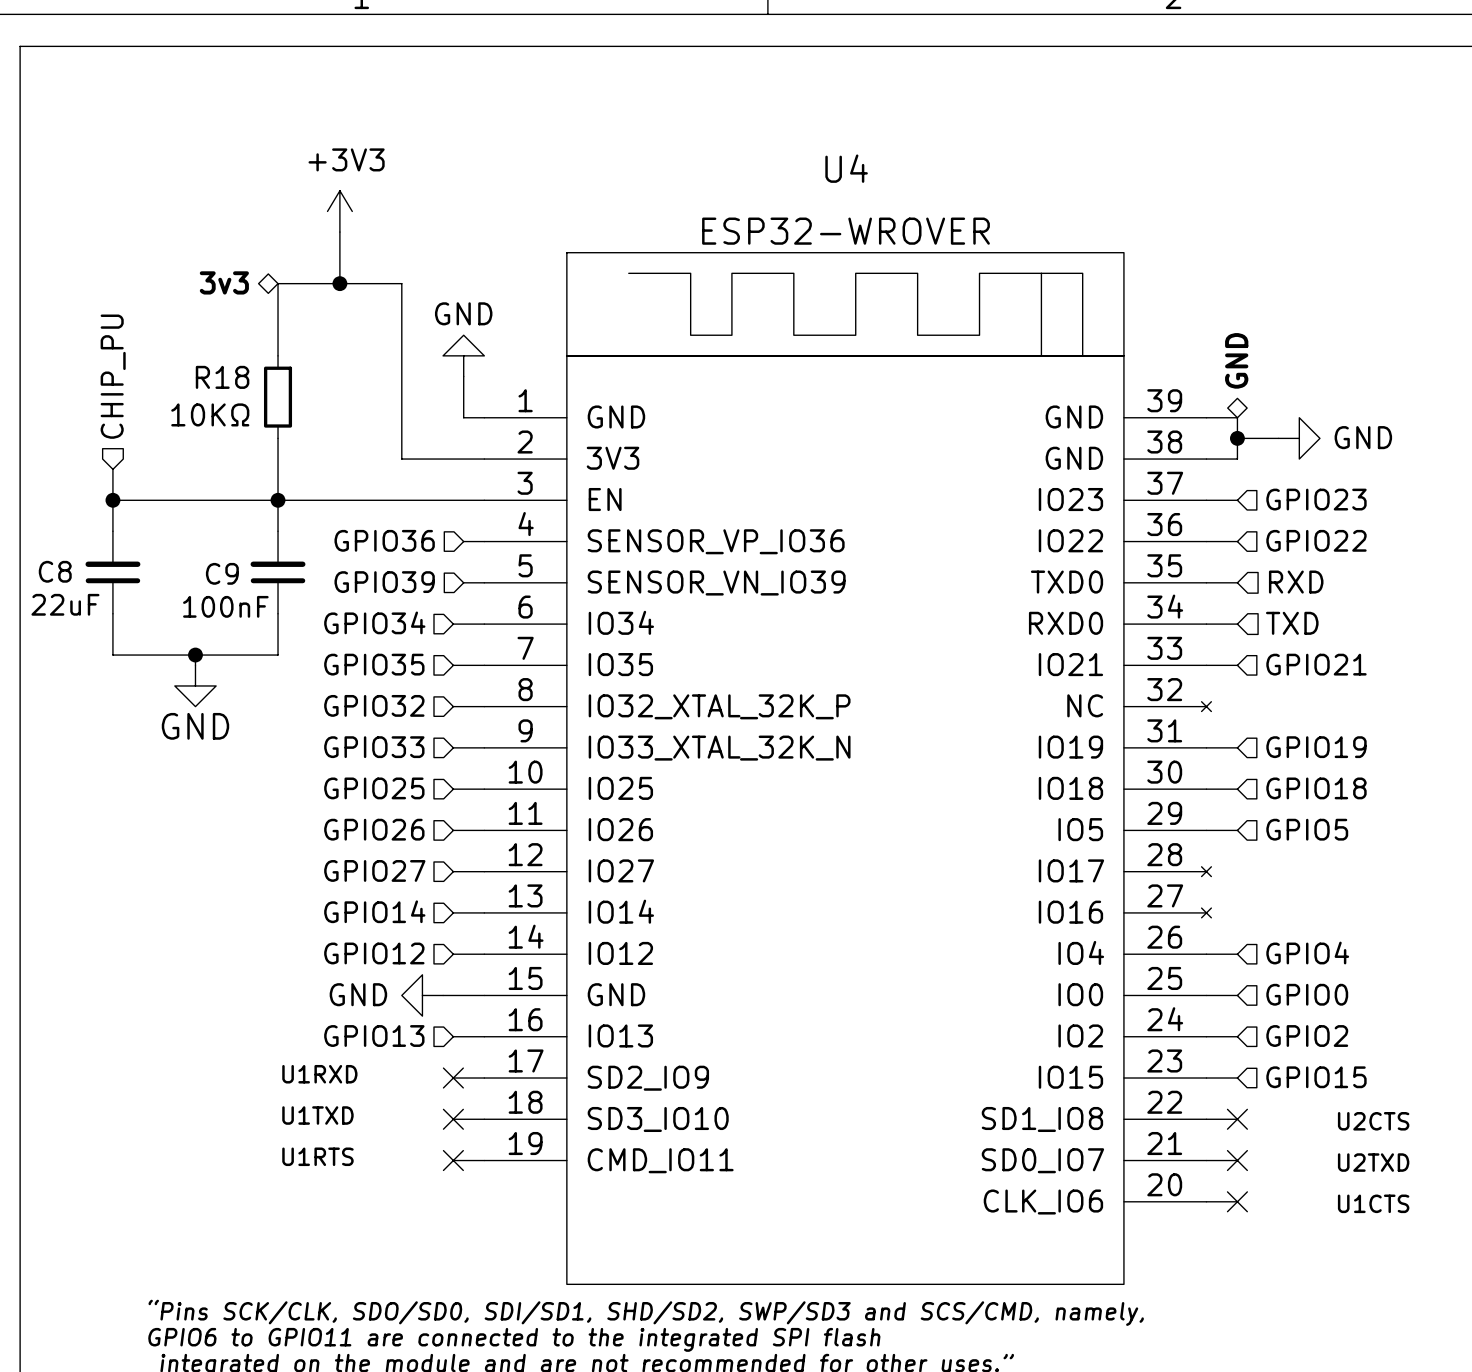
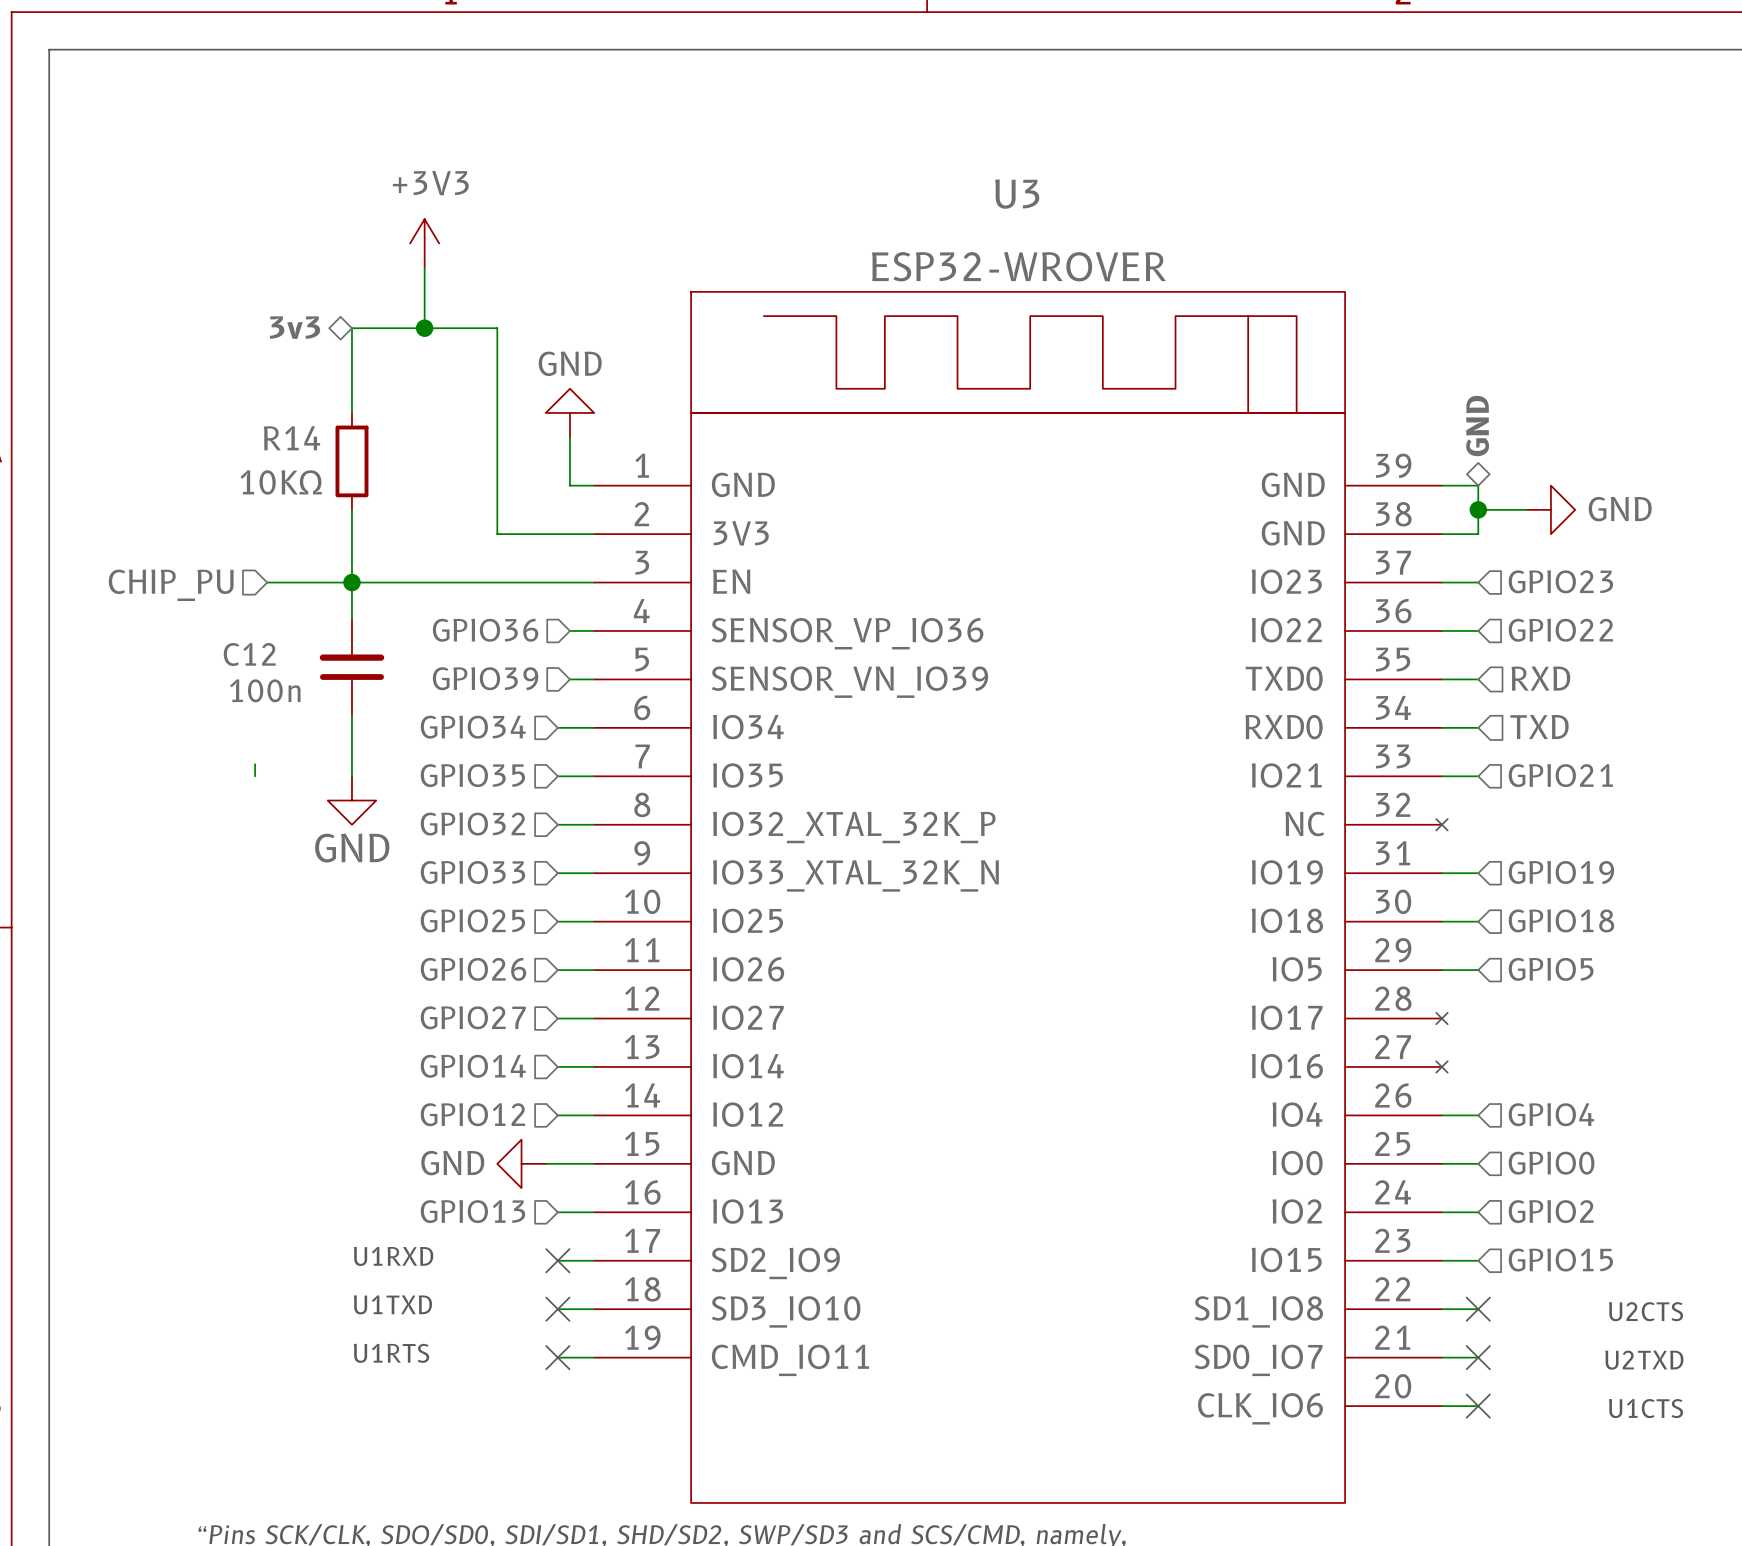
U4 name: U4 (846, 168) -> U3 (1017, 194)
hierarchical label rotation: 0° (113, 376) -> 90° counterclockwise (171, 585)
R18 name: R18 (222, 377) -> R14 (291, 438)
wire: (112, 469) (112, 531) -> none
wire: (112, 500) (205, 500) -> none
junction: (112, 500) -> none
C8: 22uF (112, 572) -> none
C9 name: C9 (222, 573) -> C12 (249, 654)
C9 value: 100nF (225, 606) -> 100n (265, 690)
wire: (112, 613) (112, 655) (278, 655) -> (351, 776) (351, 764)
junction: (195, 655) -> none
power symbol position: GND (195, 685) -> GND (351, 800)

